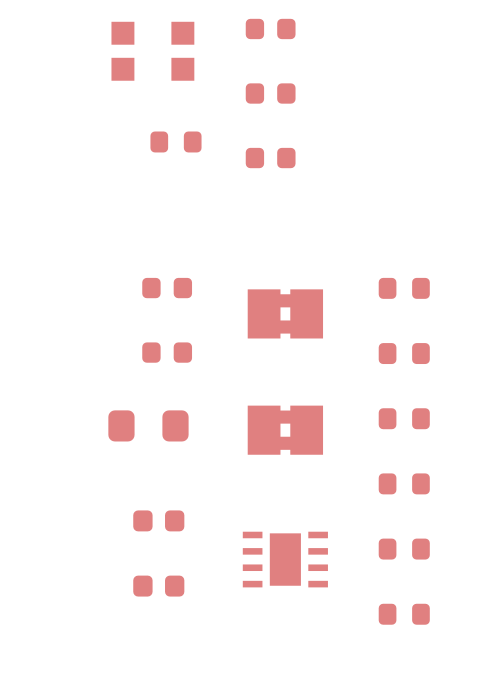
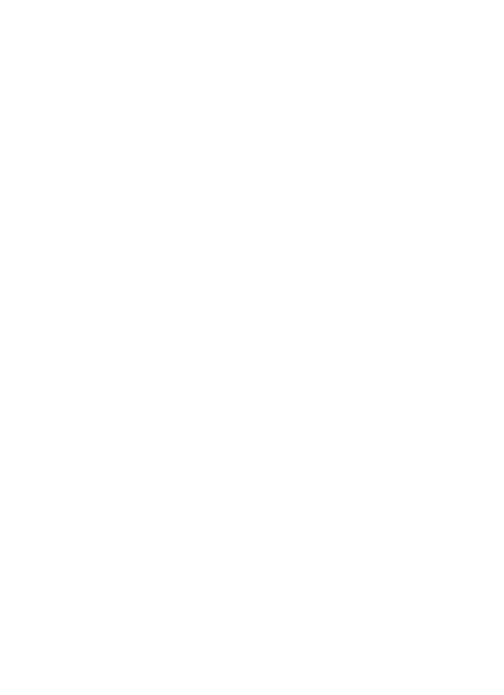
part: (270, 28) -> none
part: (152, 51) -> none
part: (270, 93) -> none
part: (175, 141) -> none
part: (270, 158) -> none
part: (167, 288) -> none
part: (404, 288) -> none
part: (285, 313) -> none
part: (167, 352) -> none
part: (404, 353) -> none
part: (404, 418) -> none
part: (148, 425) -> none
part: (285, 430) -> none
part: (404, 483) -> none
part: (158, 520) -> none
part: (404, 549) -> none
part: (285, 559) -> none
part: (158, 586) -> none
part: (404, 614) -> none

